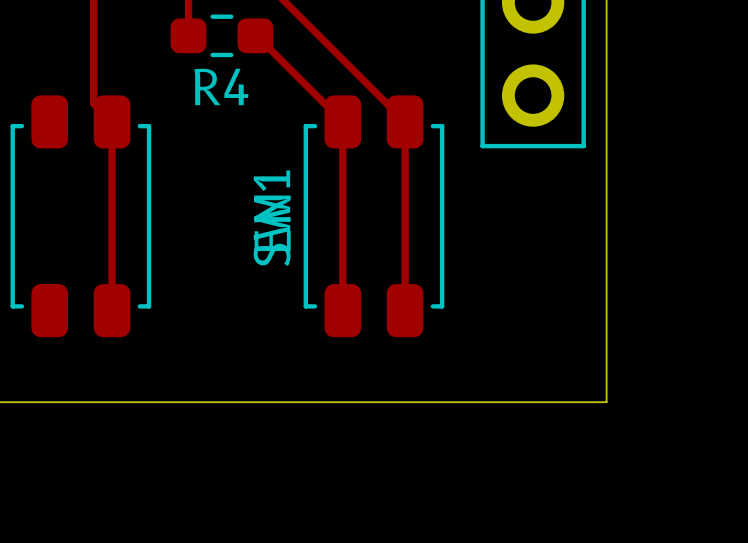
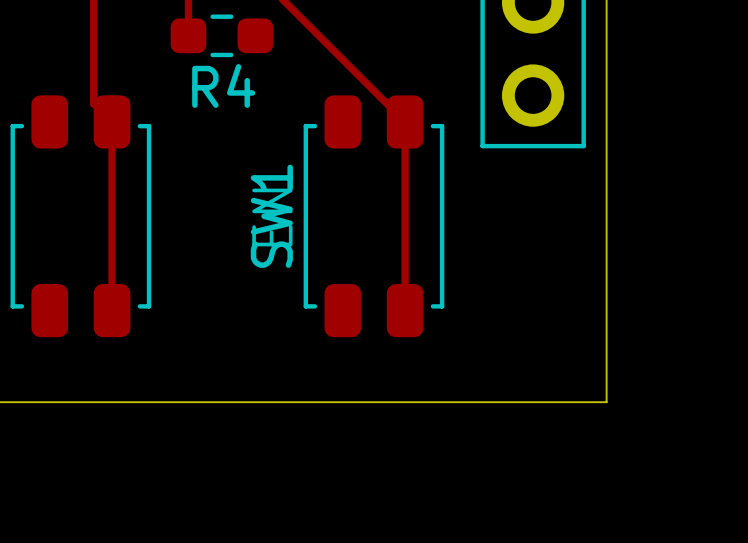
top track: (255, 35) (342, 121) (342, 310) -> none

